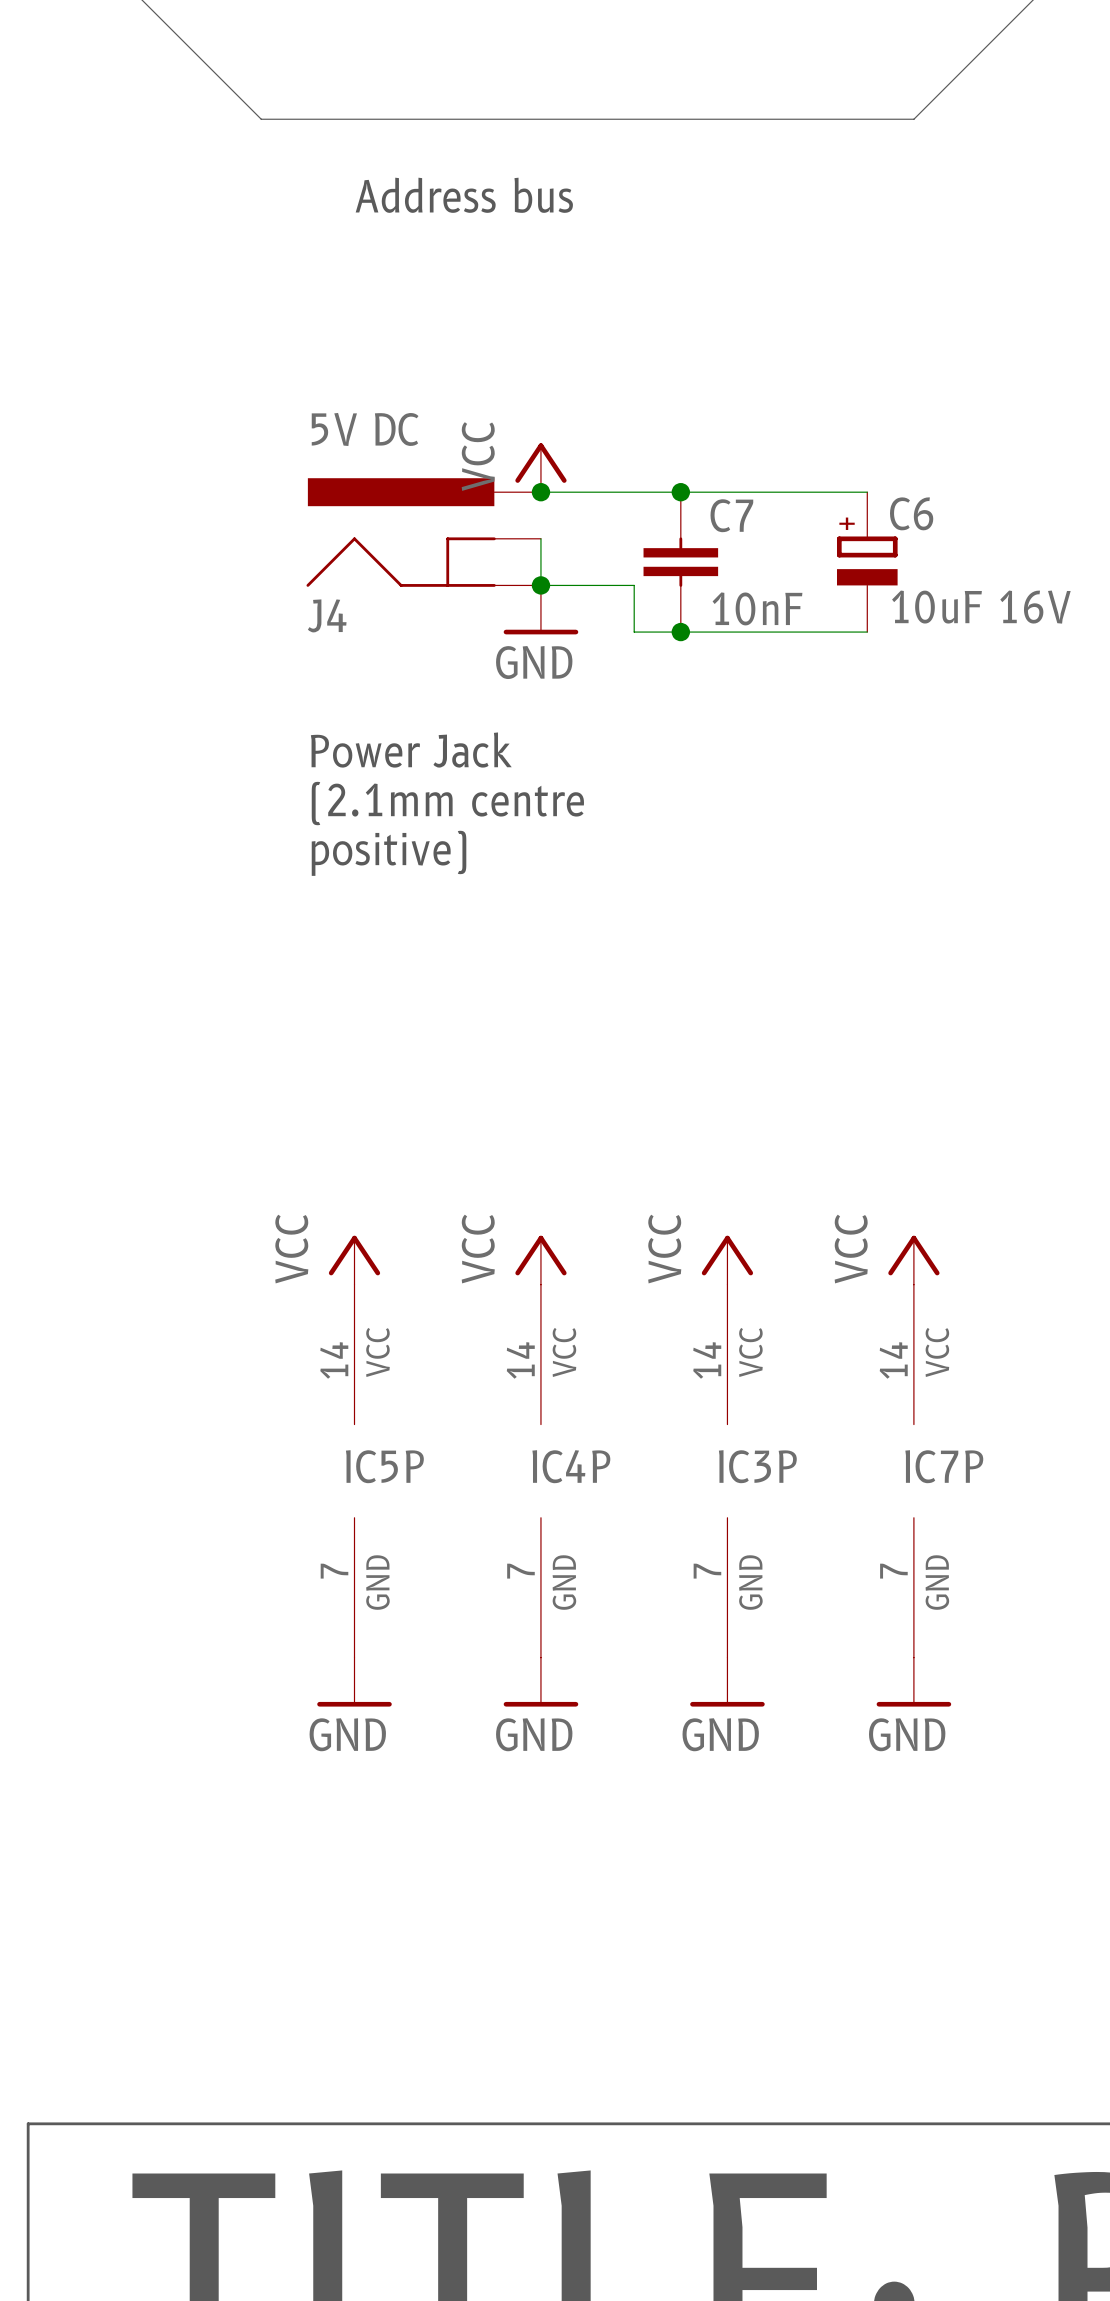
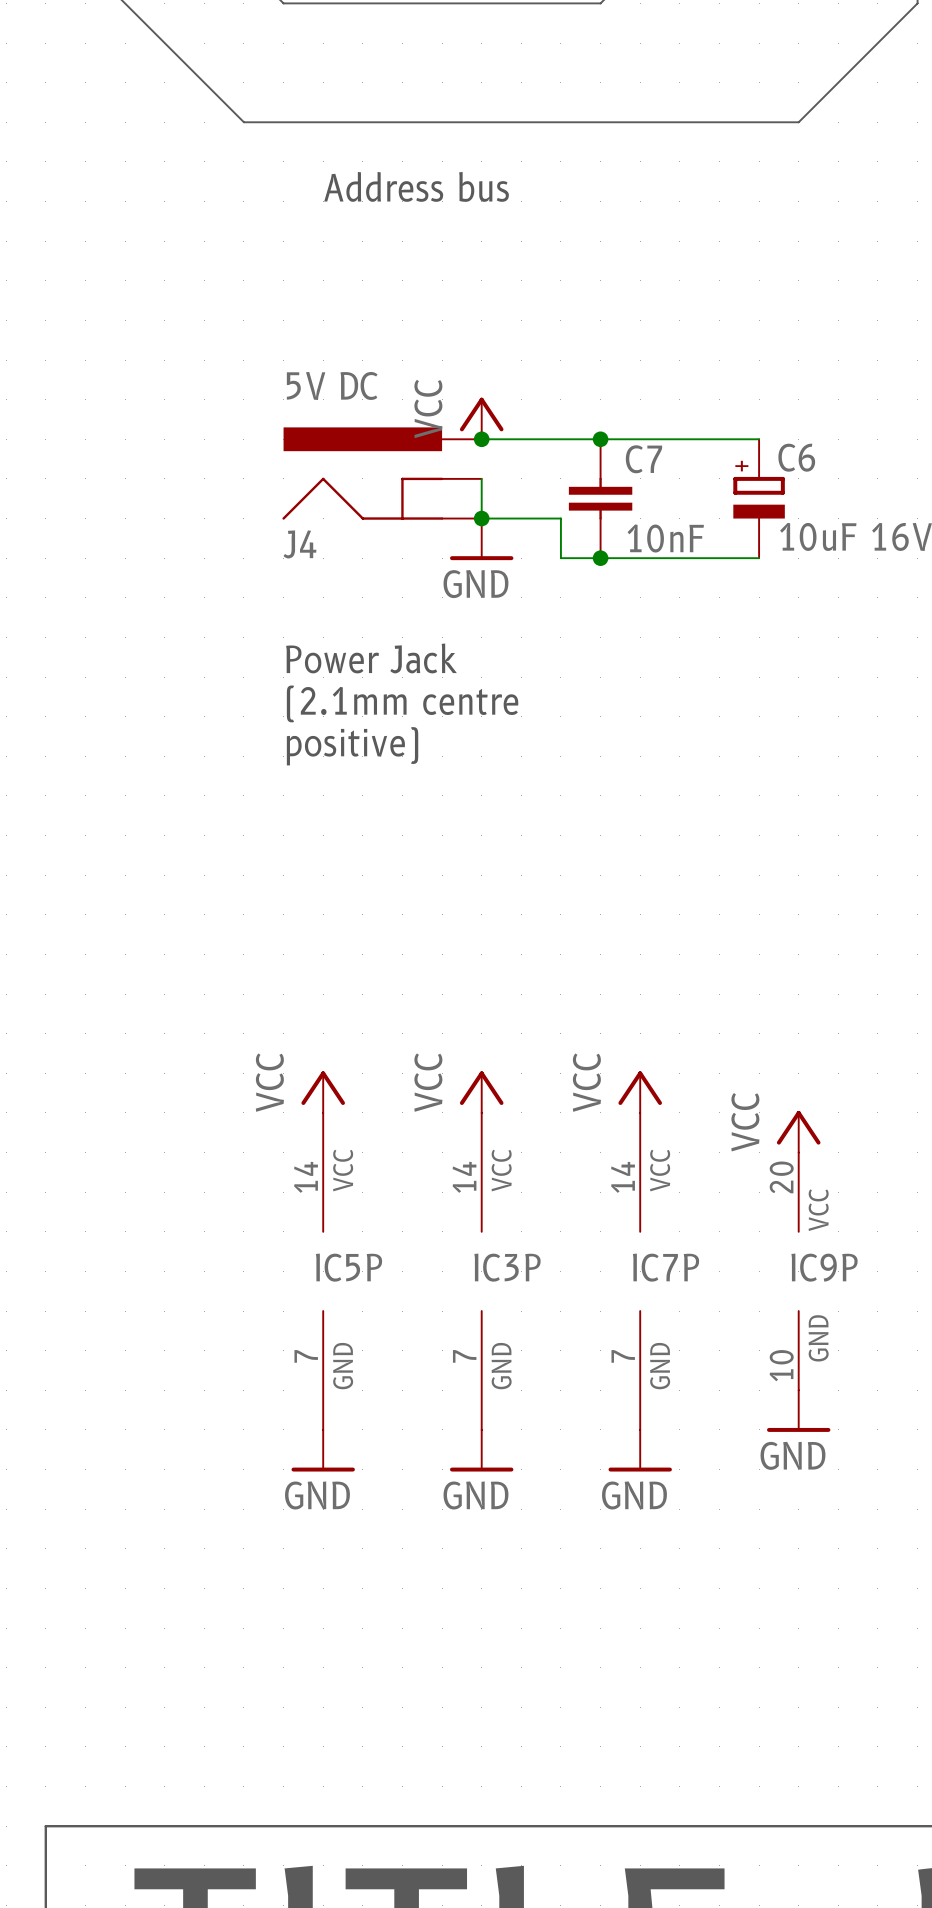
power symbol position: VCC (913, 1260) -> VCC (798, 1131)
IC4P name: IC4P (571, 1466) -> IC3P (507, 1267)
IC3P name: IC3P (757, 1466) -> IC7P (666, 1267)
IC7P: (913, 1471) -> none
IC9P: none -> (798, 1271)
power symbol position: GND (913, 1682) -> GND (798, 1411)

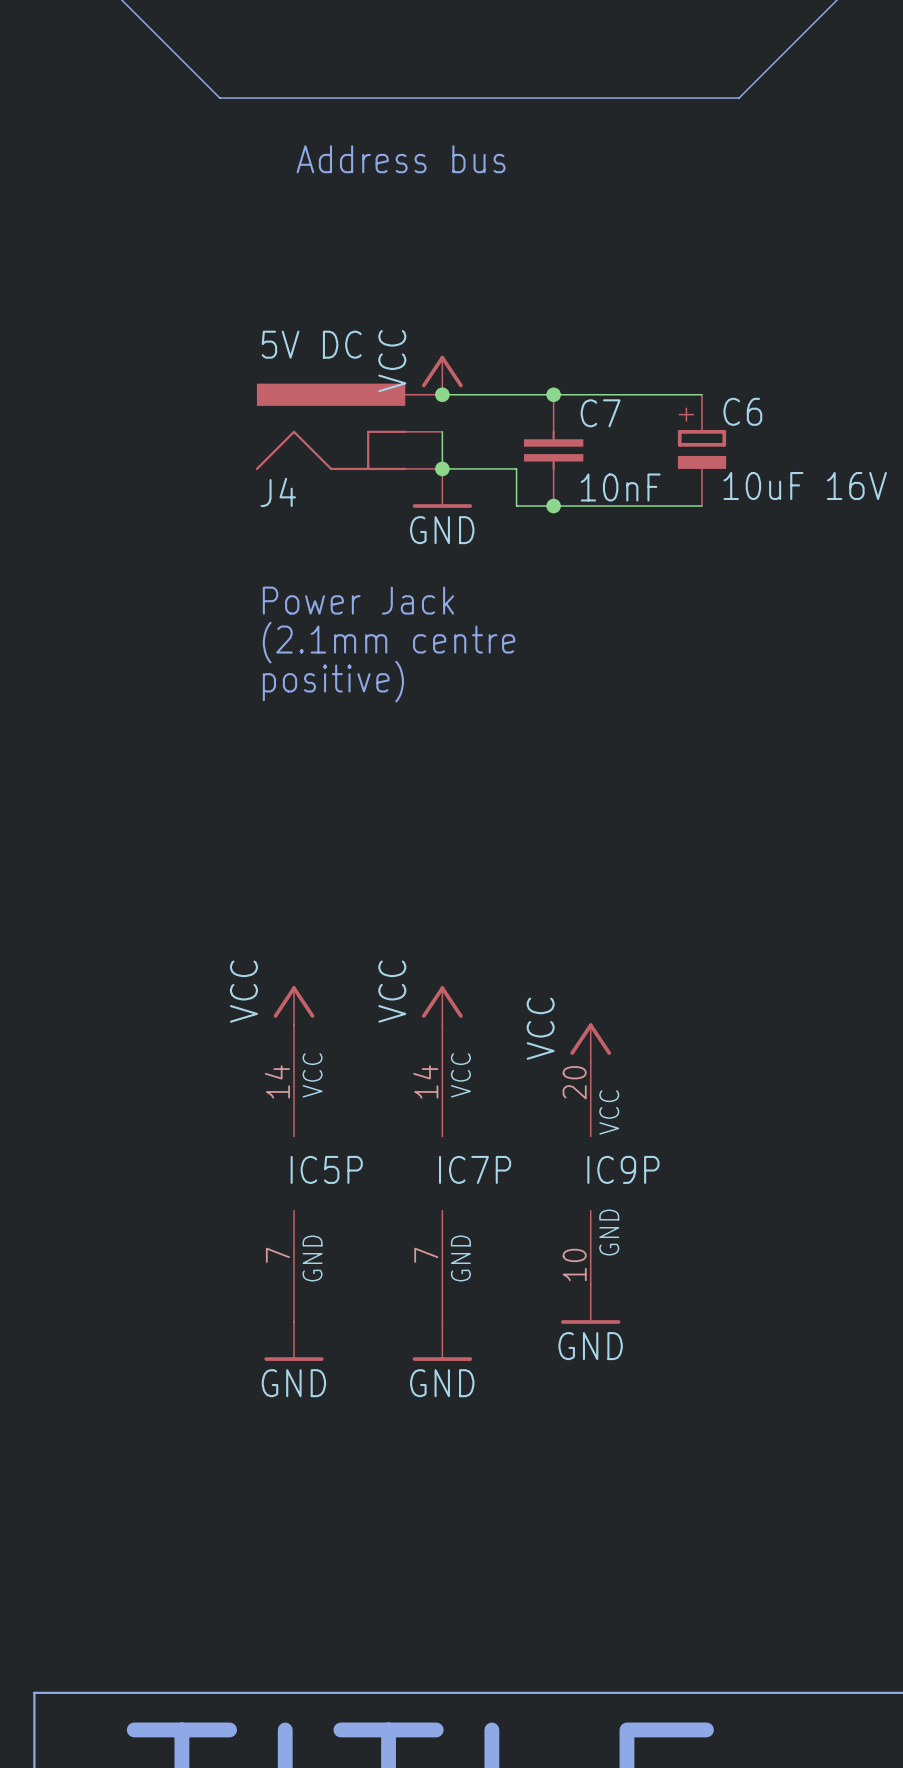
power symbol position: VCC (640, 1092) -> VCC (590, 1042)
power symbol: VCC (798, 1131) -> none
IC3P name: IC3P (507, 1267) -> IC7P (475, 1169)
IC7P: (640, 1271) -> none
IC9P position: (798, 1271) -> (590, 1173)
power symbol: GND (798, 1411) -> none
power symbol position: GND (640, 1450) -> GND (590, 1304)

